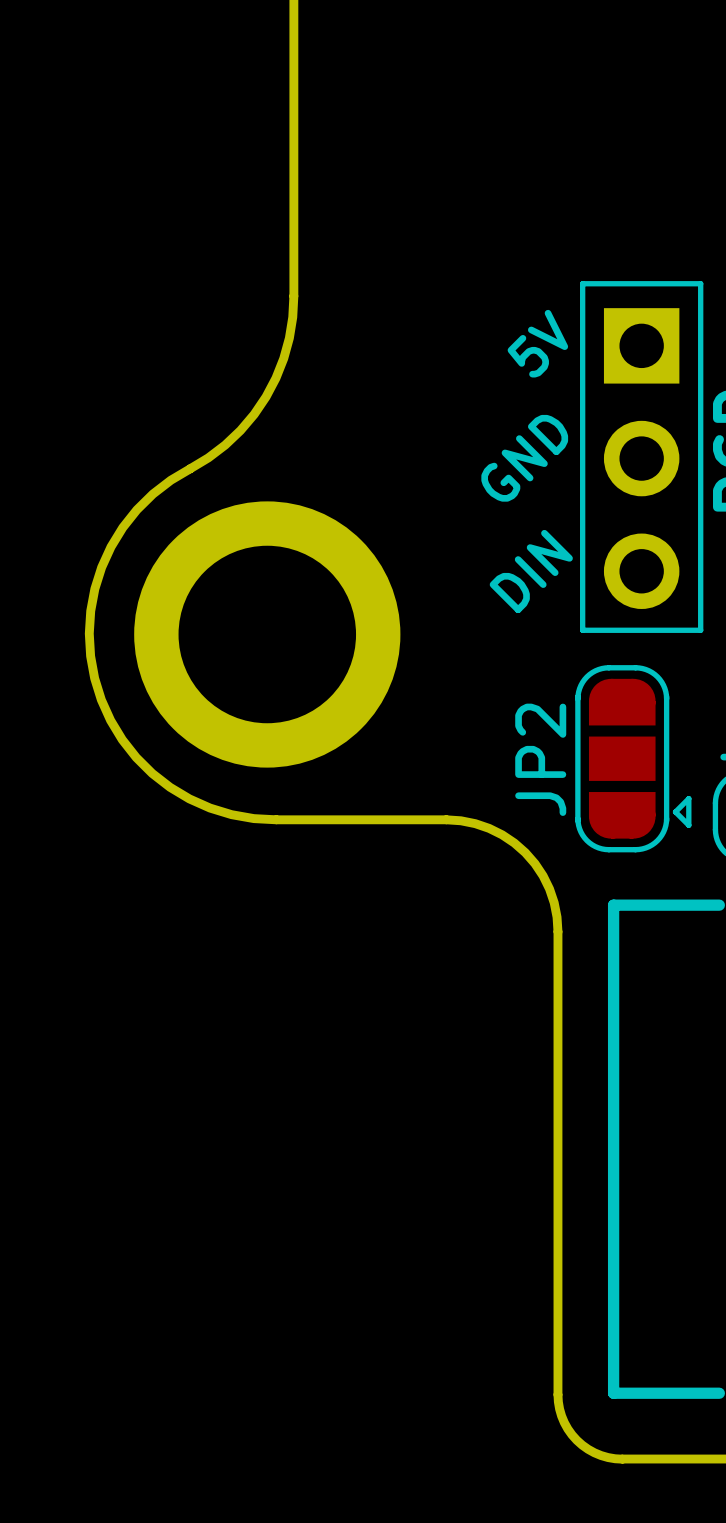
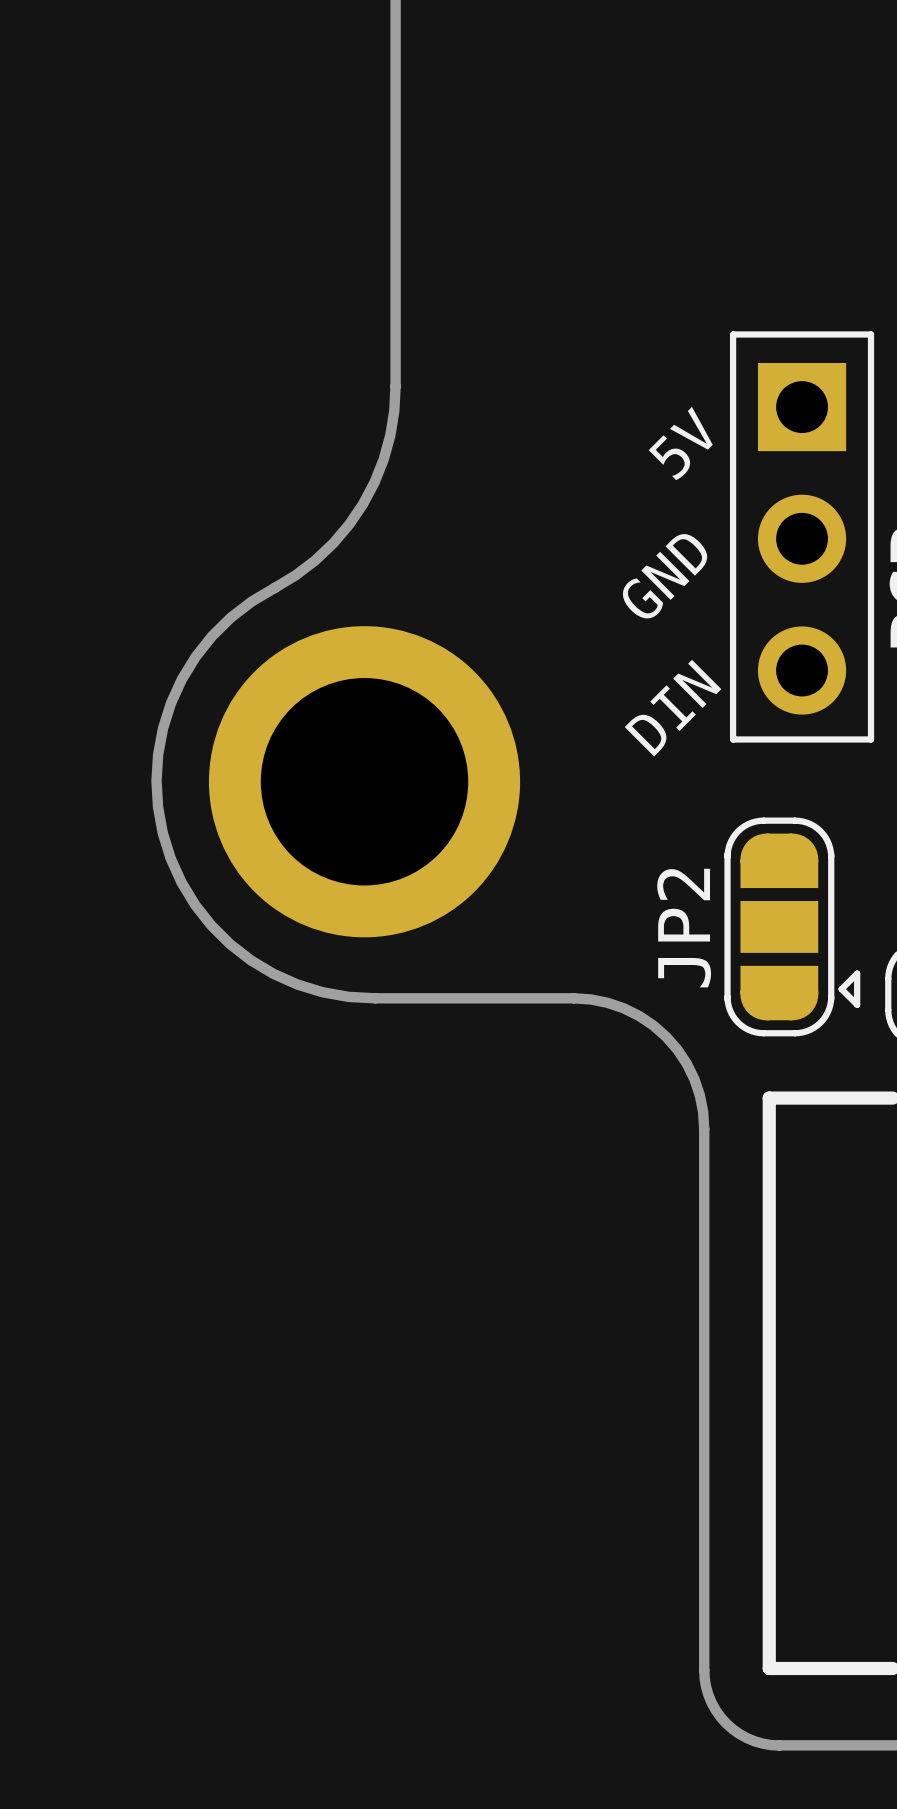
part position: (641, 457) -> (802, 536)

